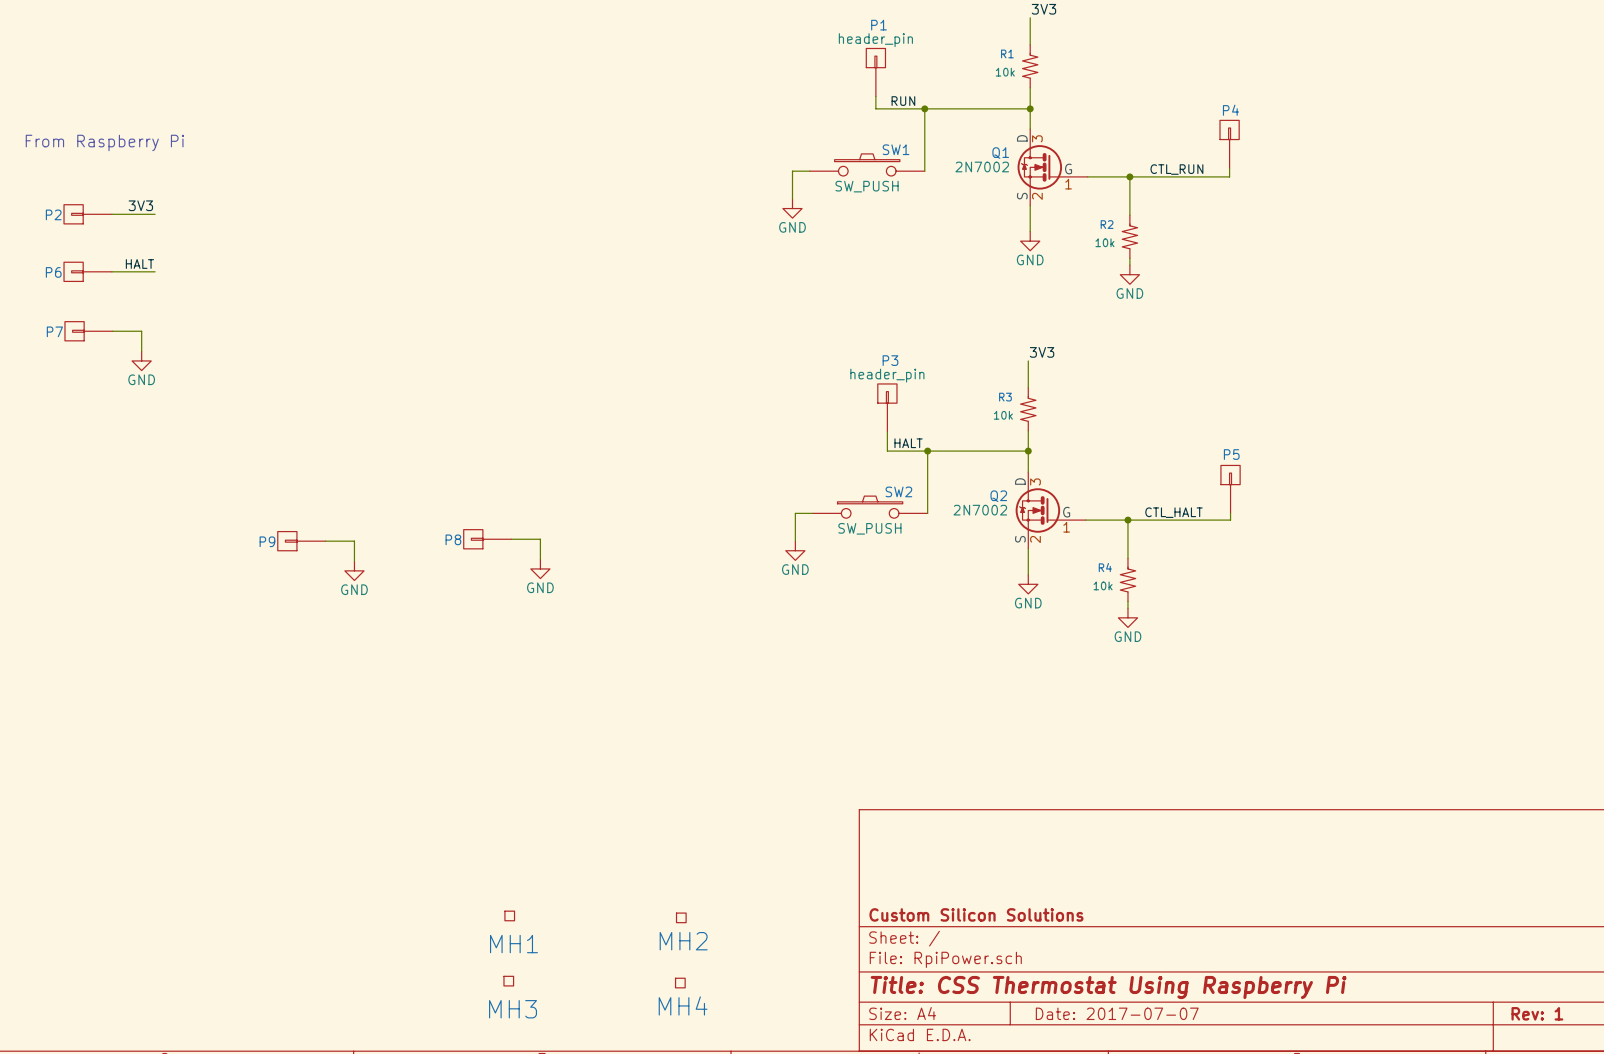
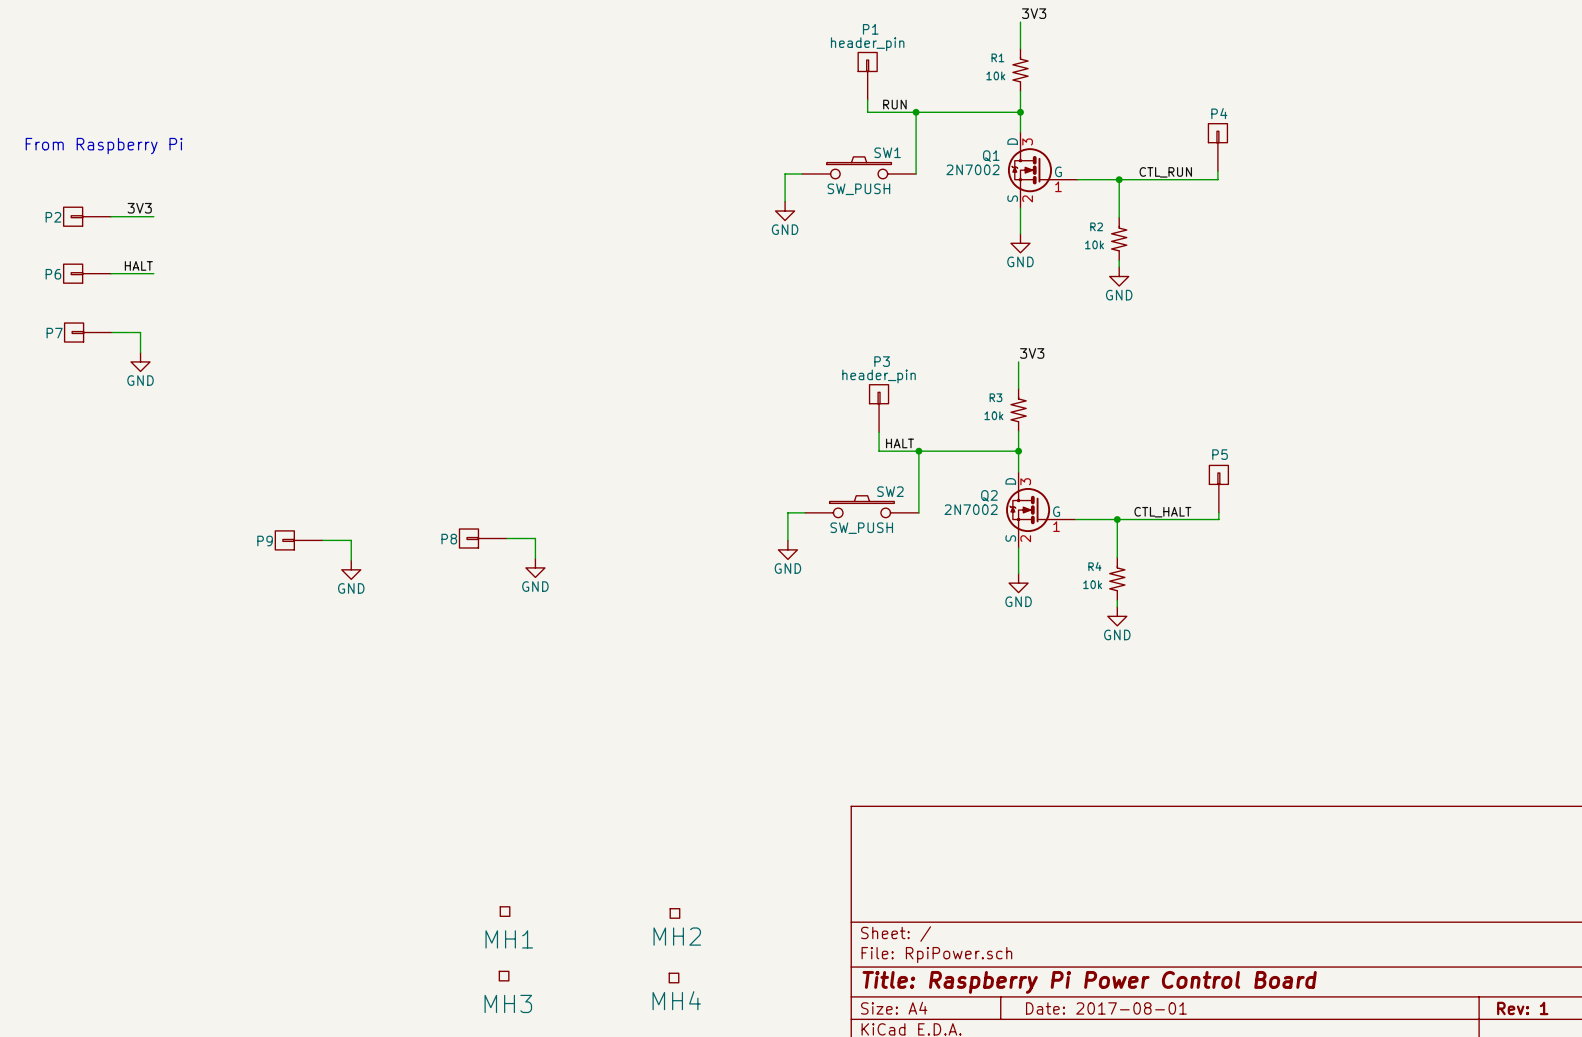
title block: Custom Silicon Solutions (976, 914) -> none
title block: Title: CSS Thermostat Using Raspberry Pi (1108, 987) -> Title: Raspberry Pi Power Control Board (1089, 982)
title block: Date: 2017-07-07 (1117, 1013) -> Date: 2017-08-01 (1106, 1008)

